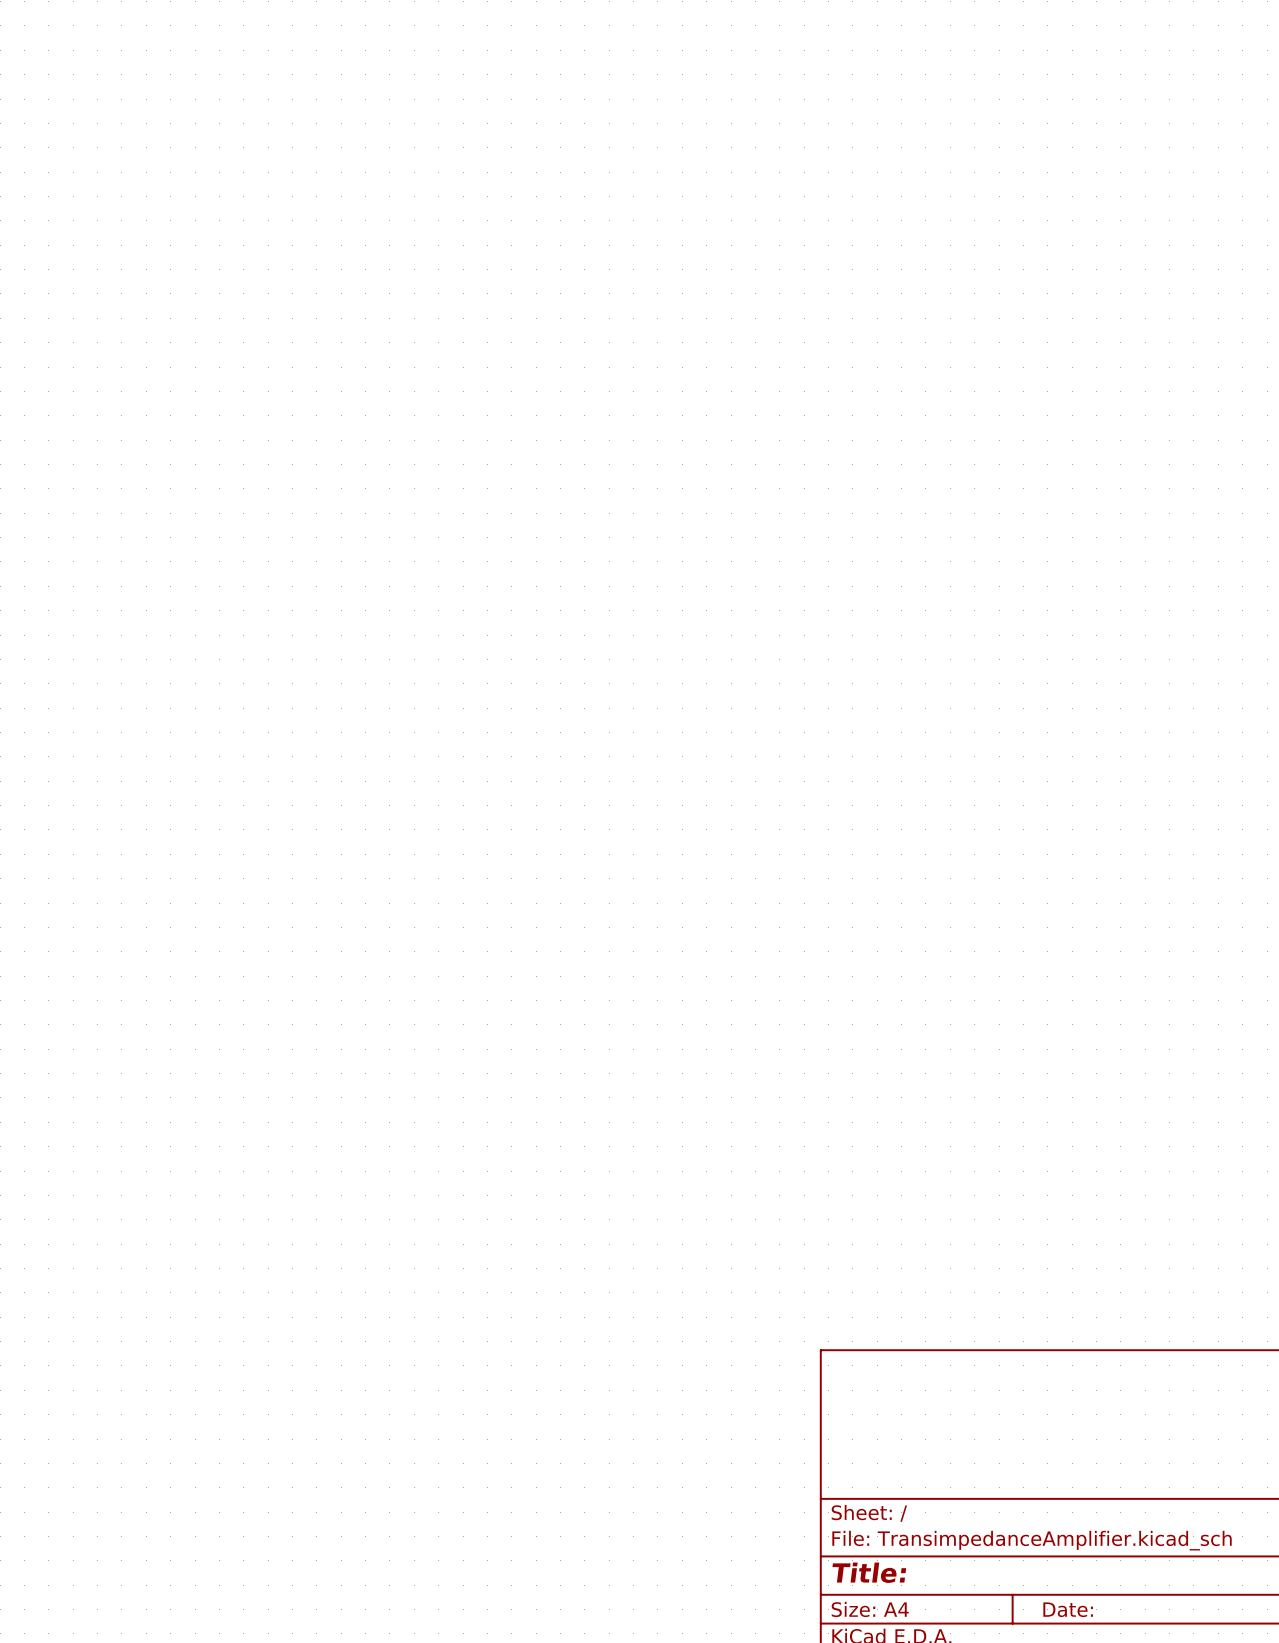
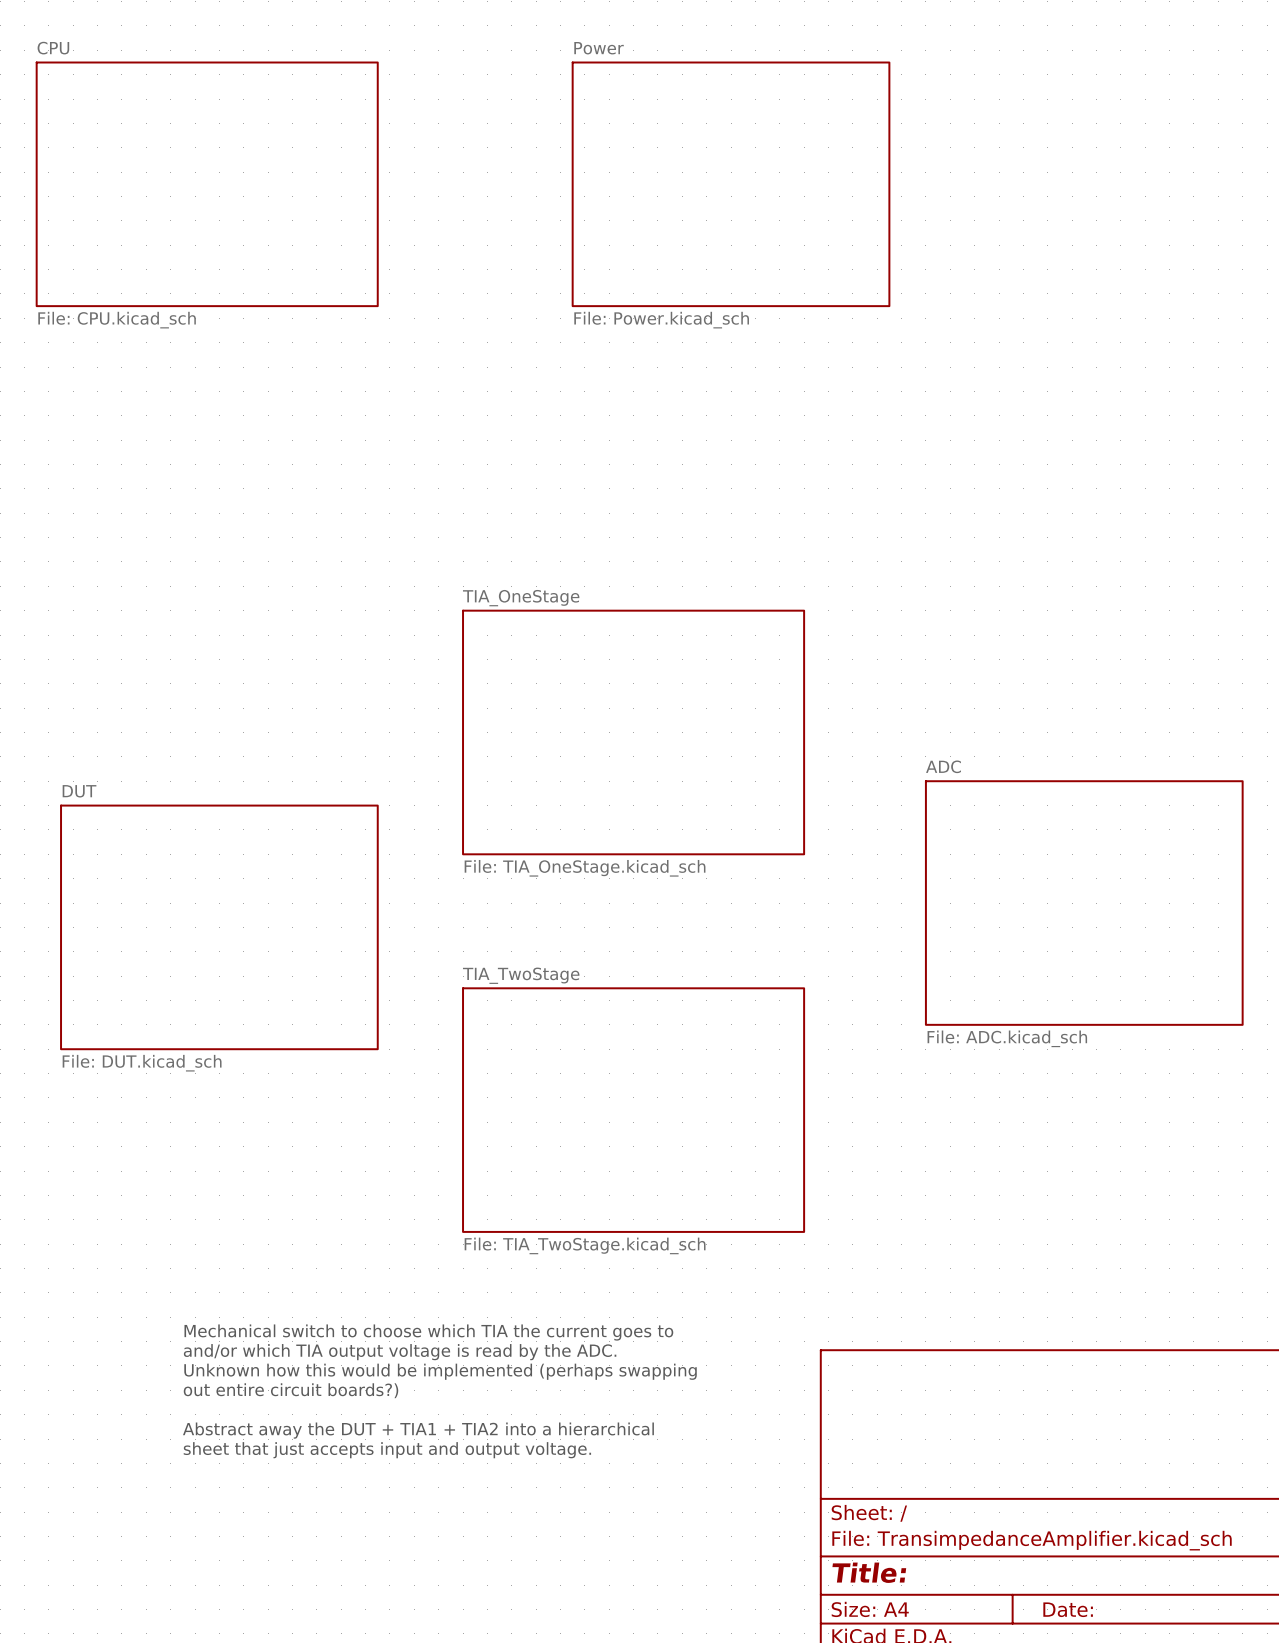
sheet CPU: none -> File: CPU.kicad_sch (207, 184)
sheet Power: none -> File: Power.kicad_sch (731, 184)
sheet TIA_OneStage: none -> File: TIA_OneStage.kicad_sch (633, 732)
sheet ADC: none -> File: ADC.kicad_sch (1084, 903)
sheet DUT: none -> File: DUT.kicad_sch (219, 927)
sheet TIA_TwoStage: none -> File: TIA_TwoStage.kicad_sch (633, 1110)
text: none -> Mechanical switch to choose which TIA the current goes to (428, 1332)
text: none -> and/or which TIA output voltage is read by the ADC. (400, 1352)
text: none -> Unknown how this would be implemented (perhaps swapping (440, 1371)
text: none -> out entire circuit boards?) (291, 1390)
text: none -> Abstract away the DUT + TIA1 + TIA2 into a hierarchical (418, 1430)
text: none -> sheet that just accepts input and output voltage. (387, 1450)

